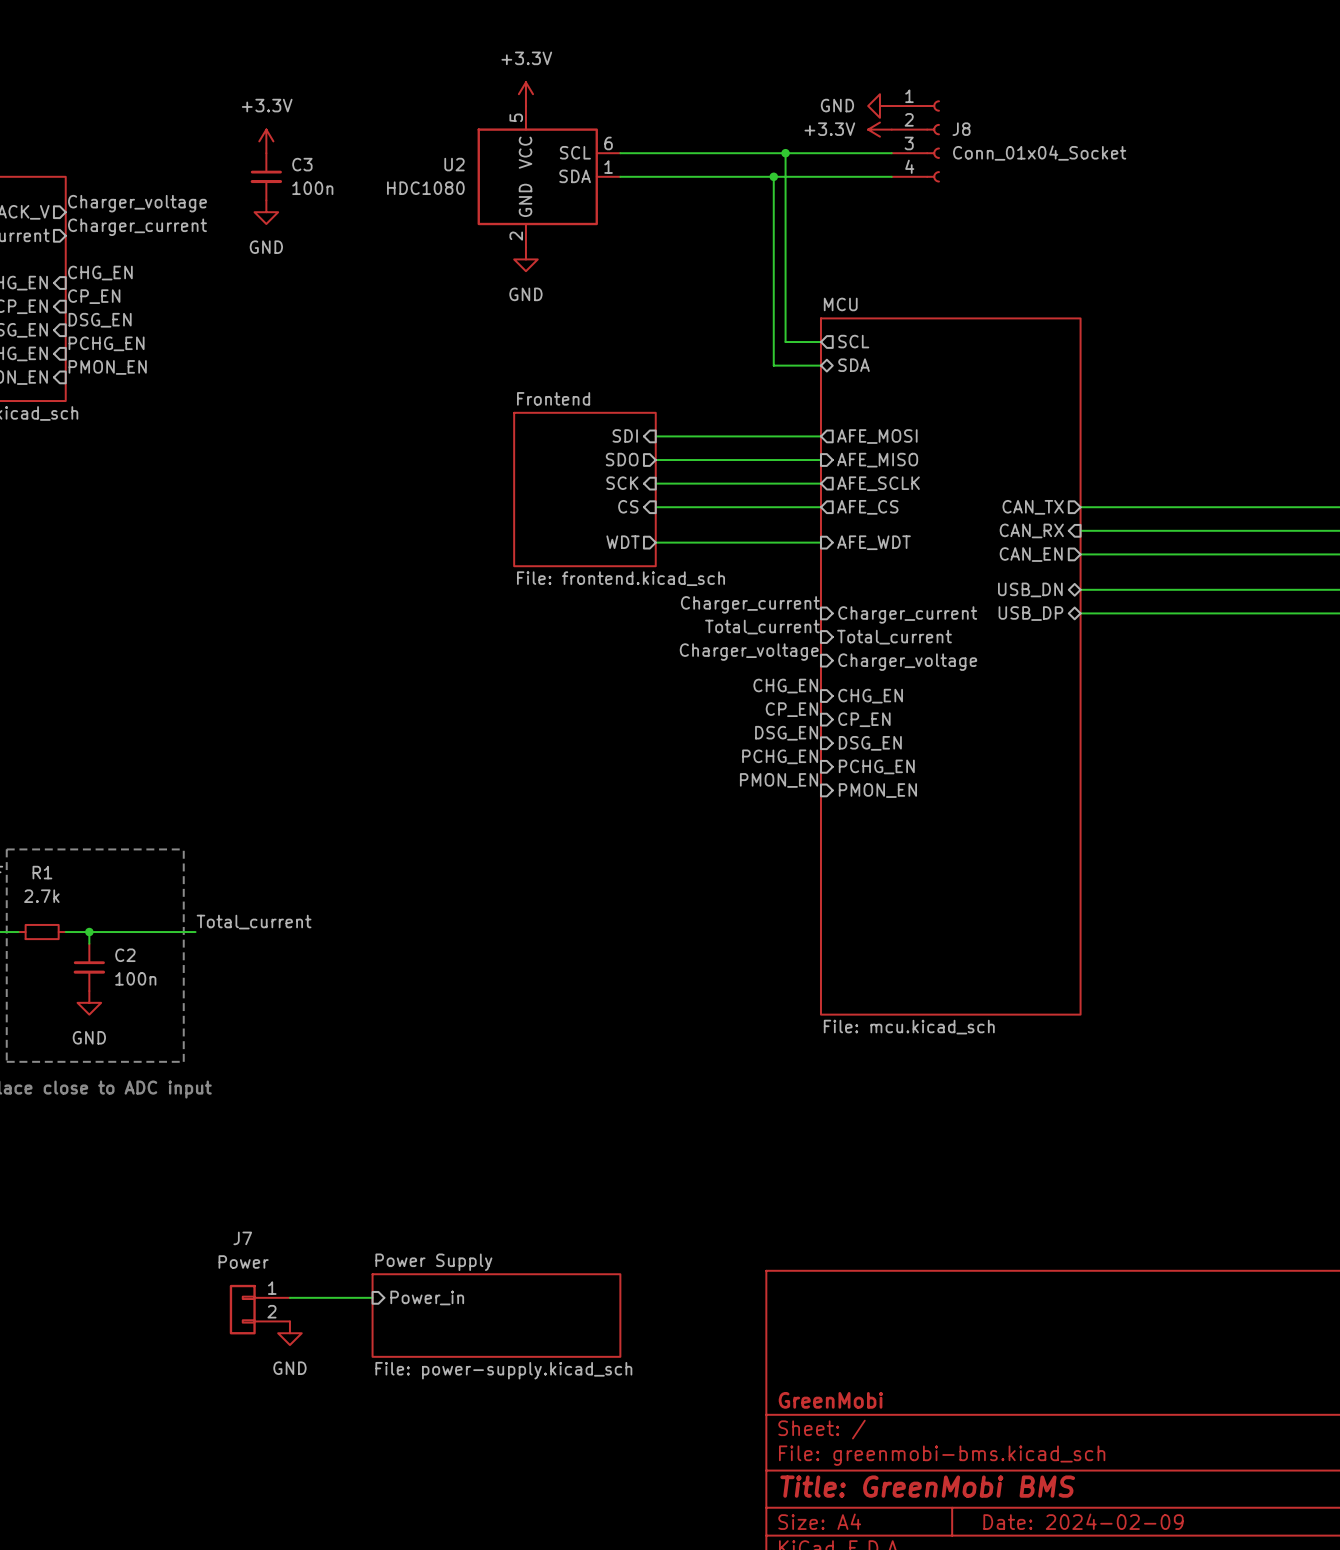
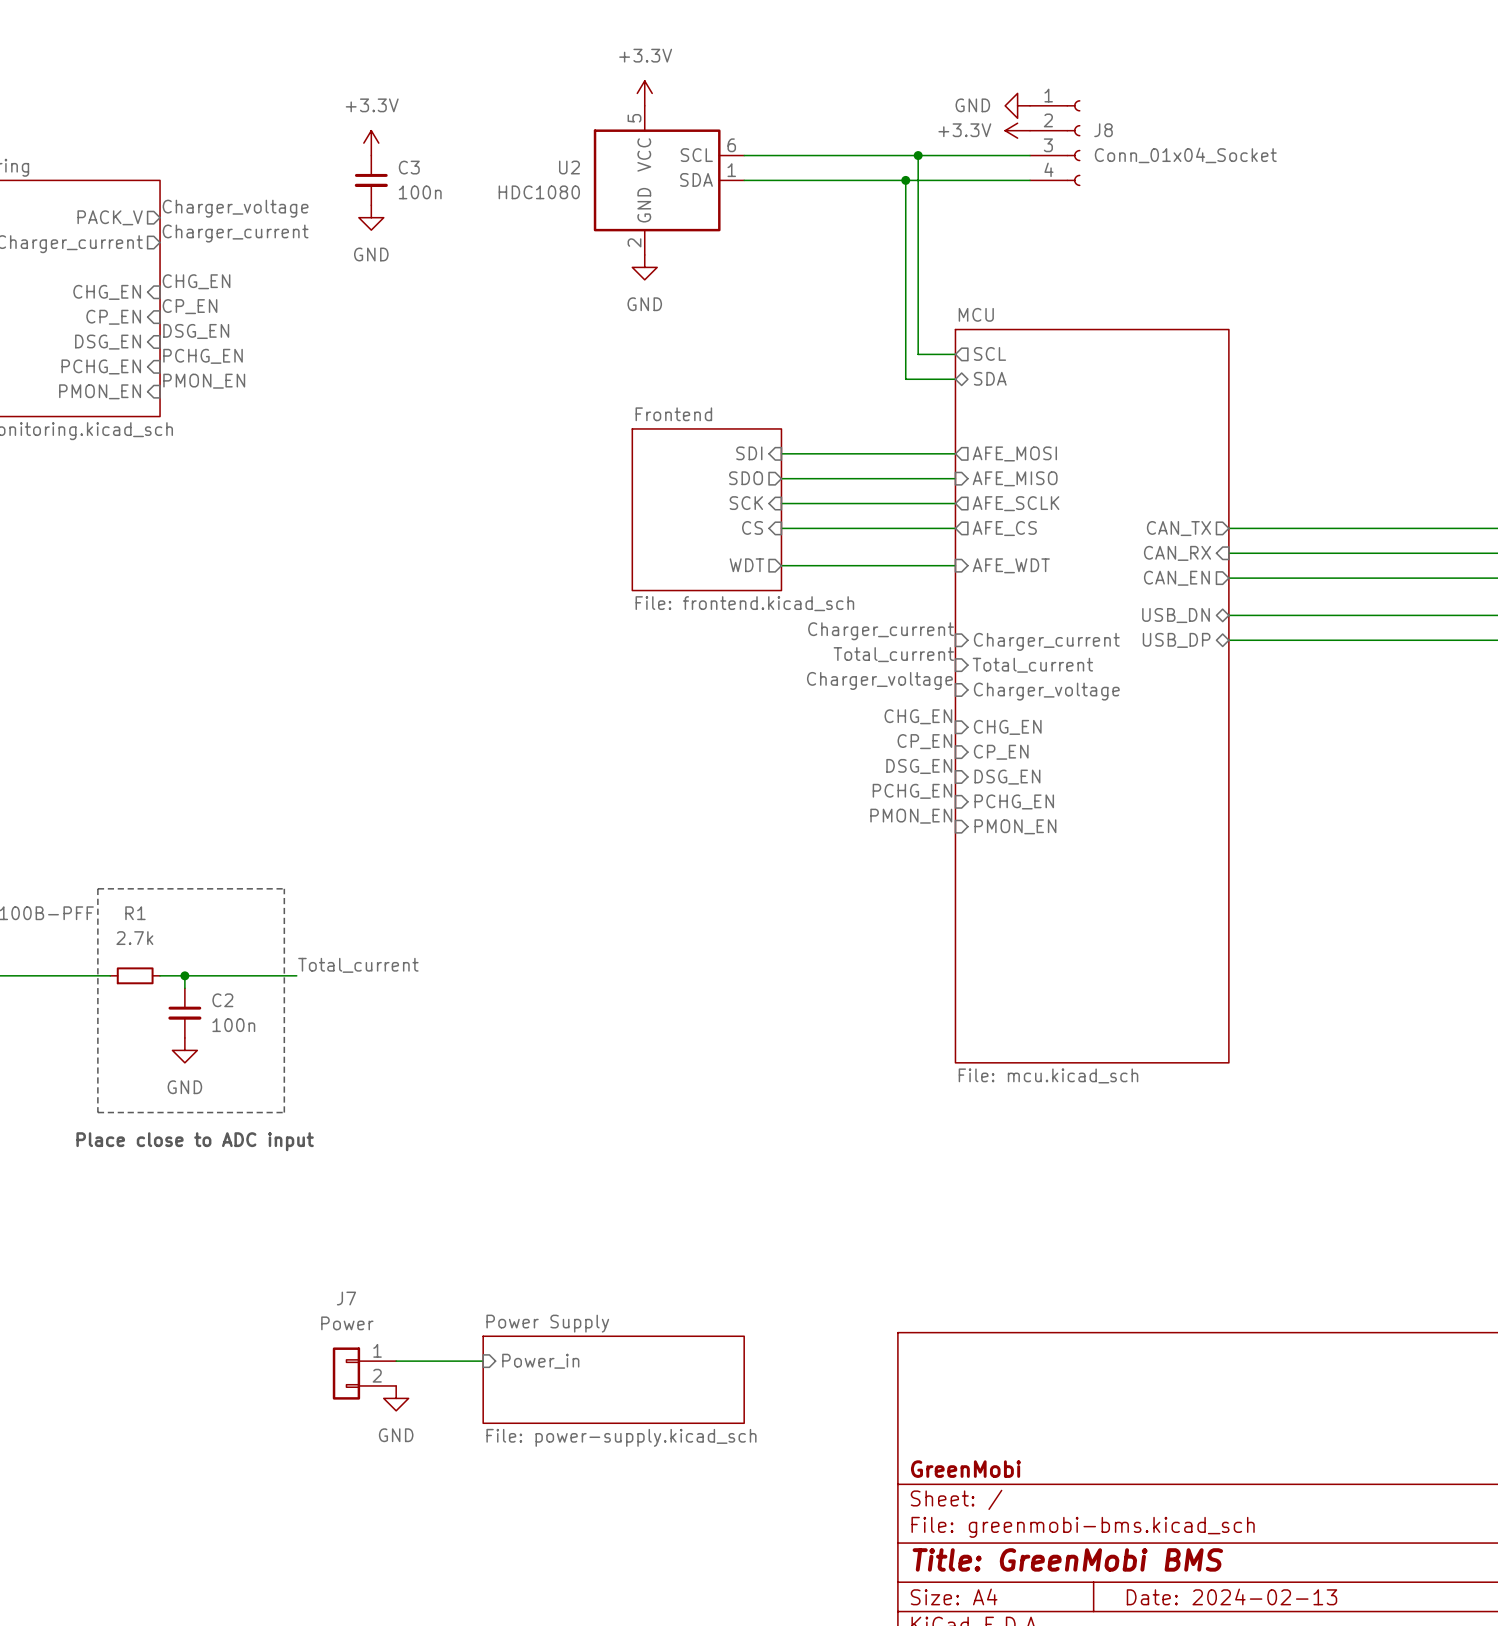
title block: Date: 2024-02-09 (1083, 1521) -> Date: 2024-02-13 (1231, 1596)

